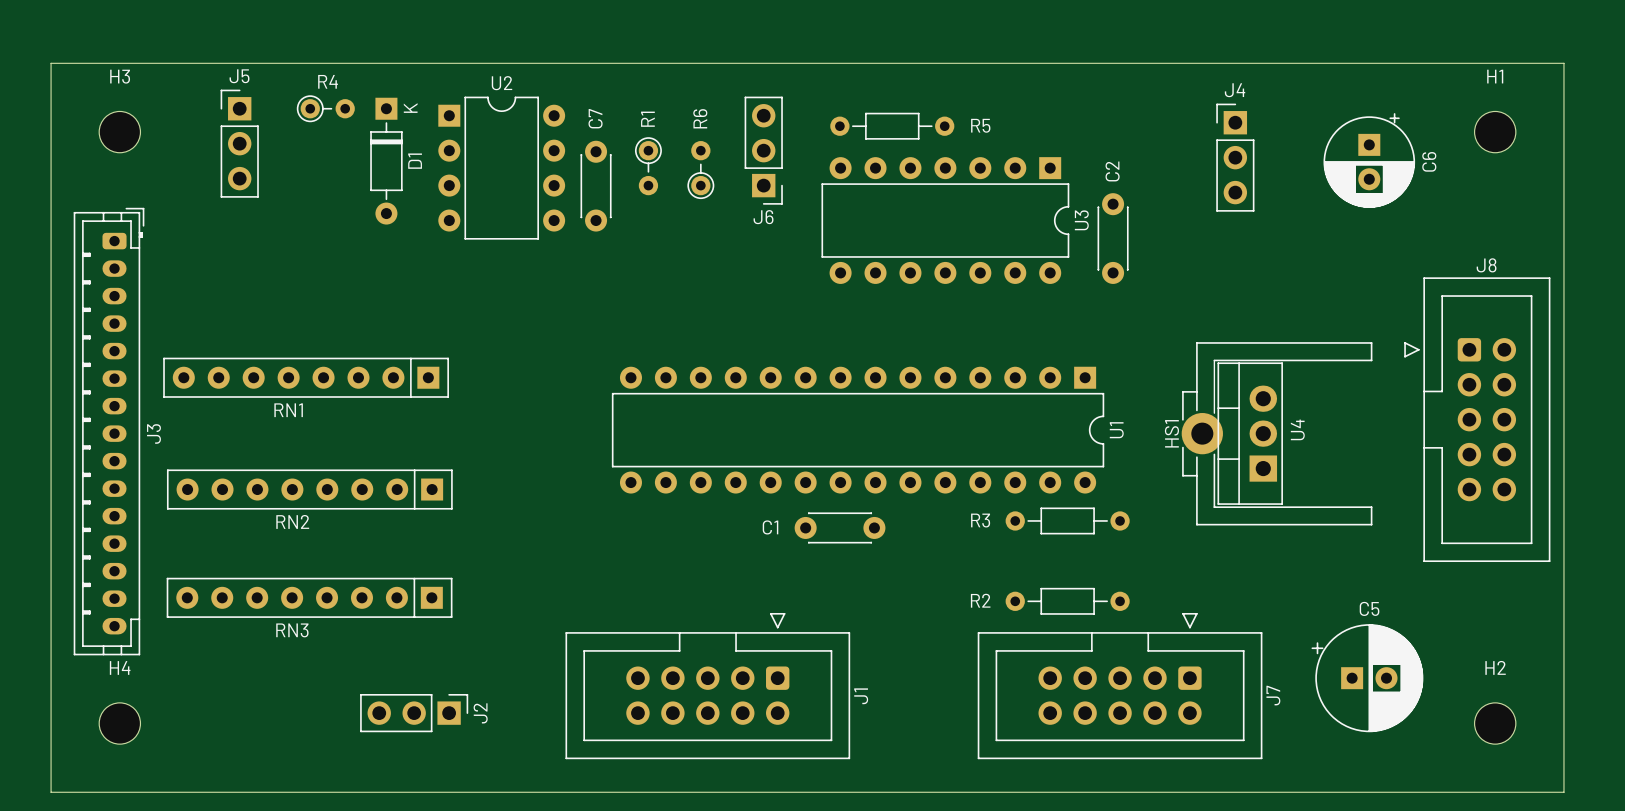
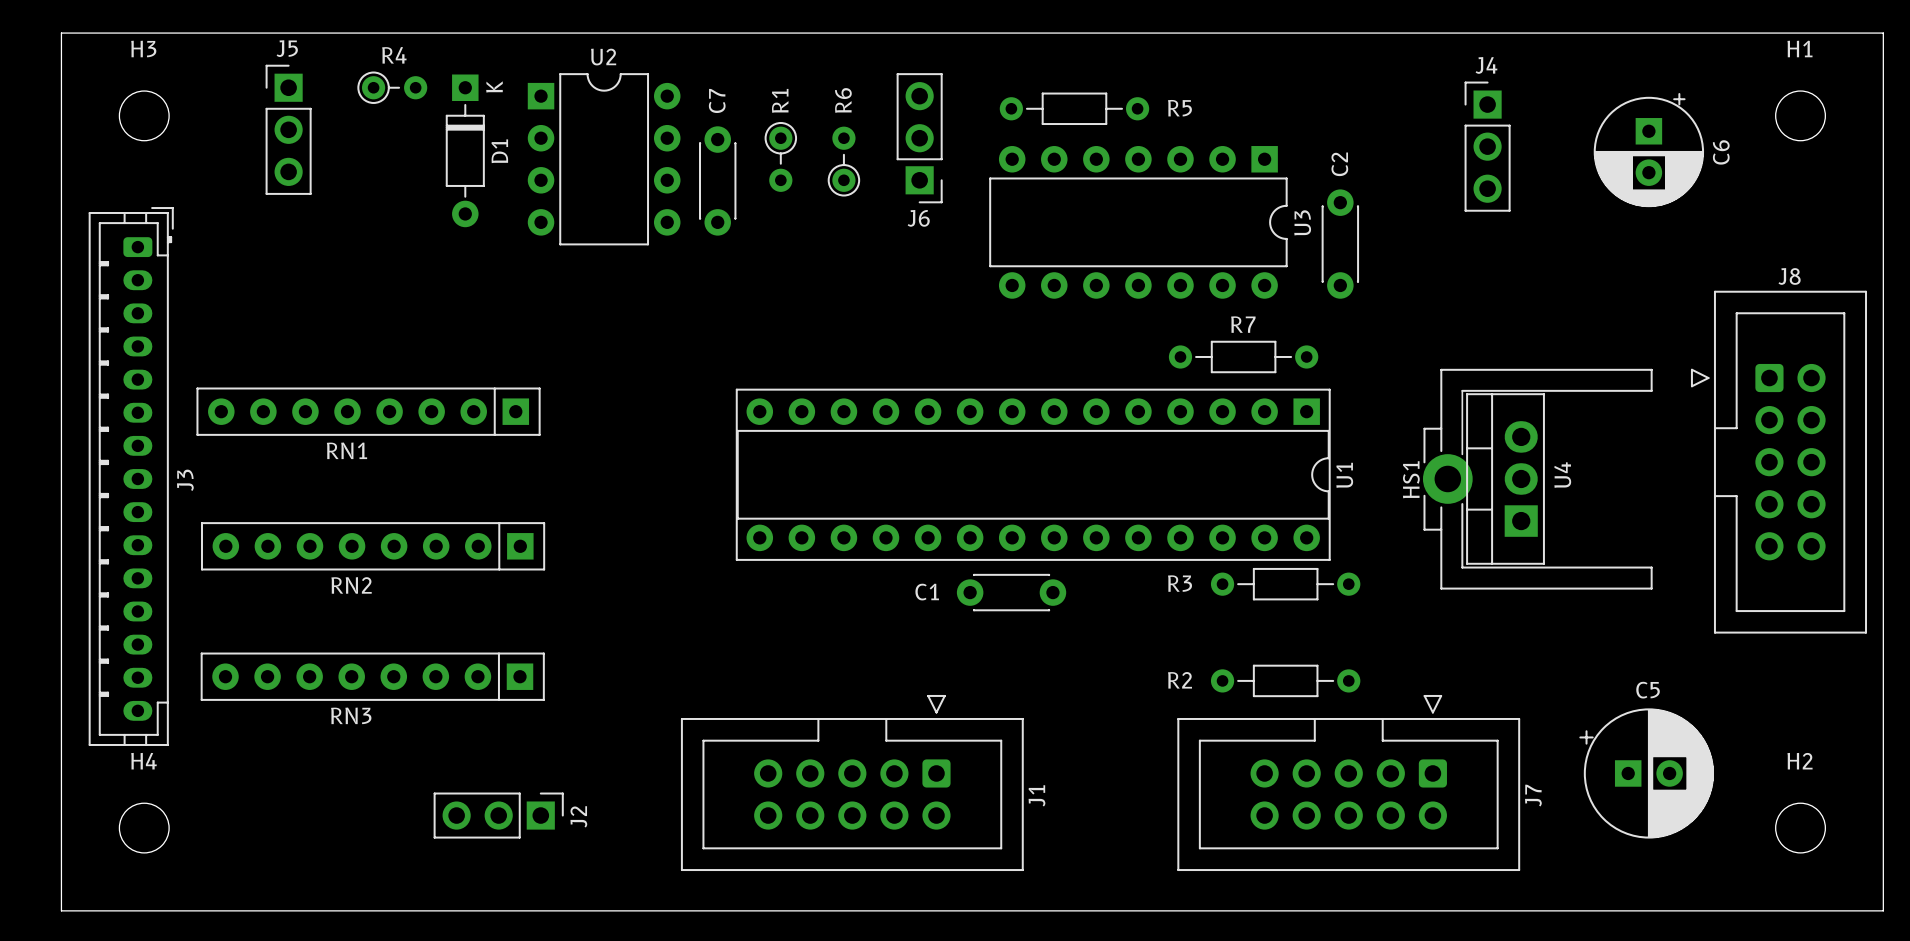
R7: none -> (1243, 356)
U1 footprint: [611, 366, 1105, 494] -> [735, 388, 1331, 561]

